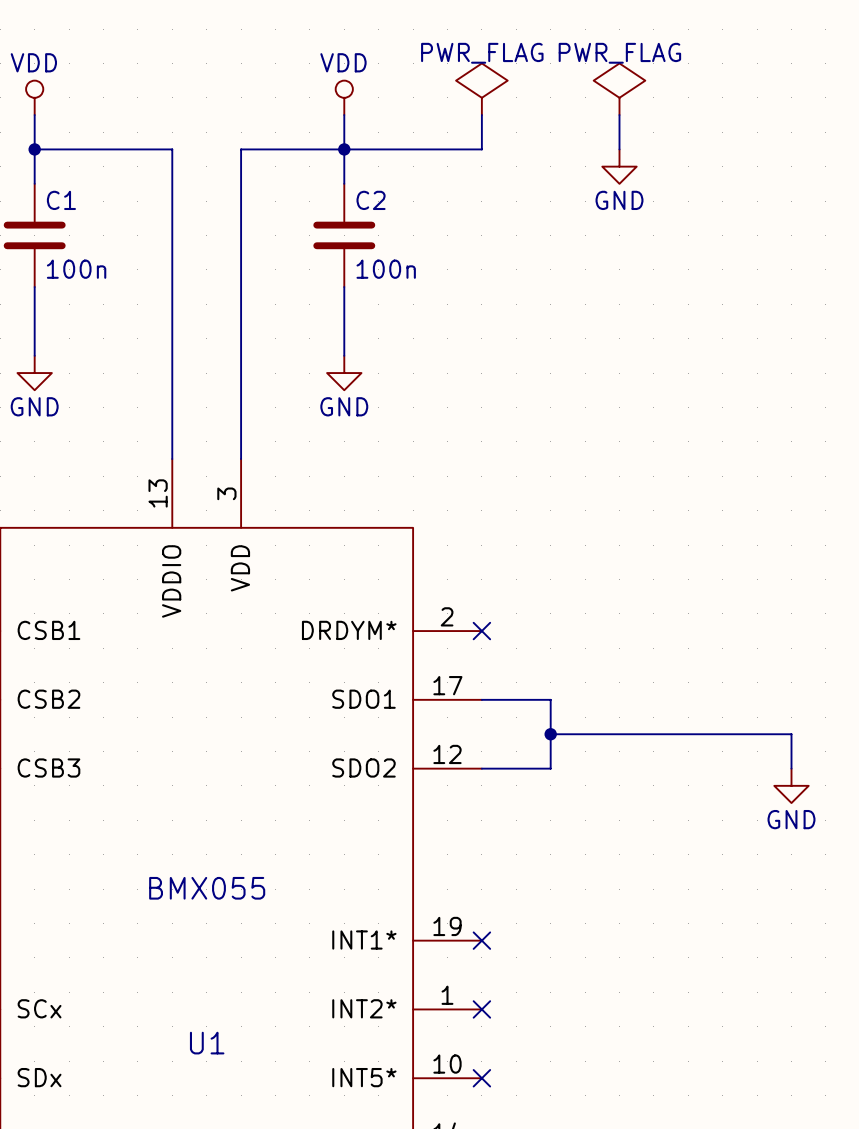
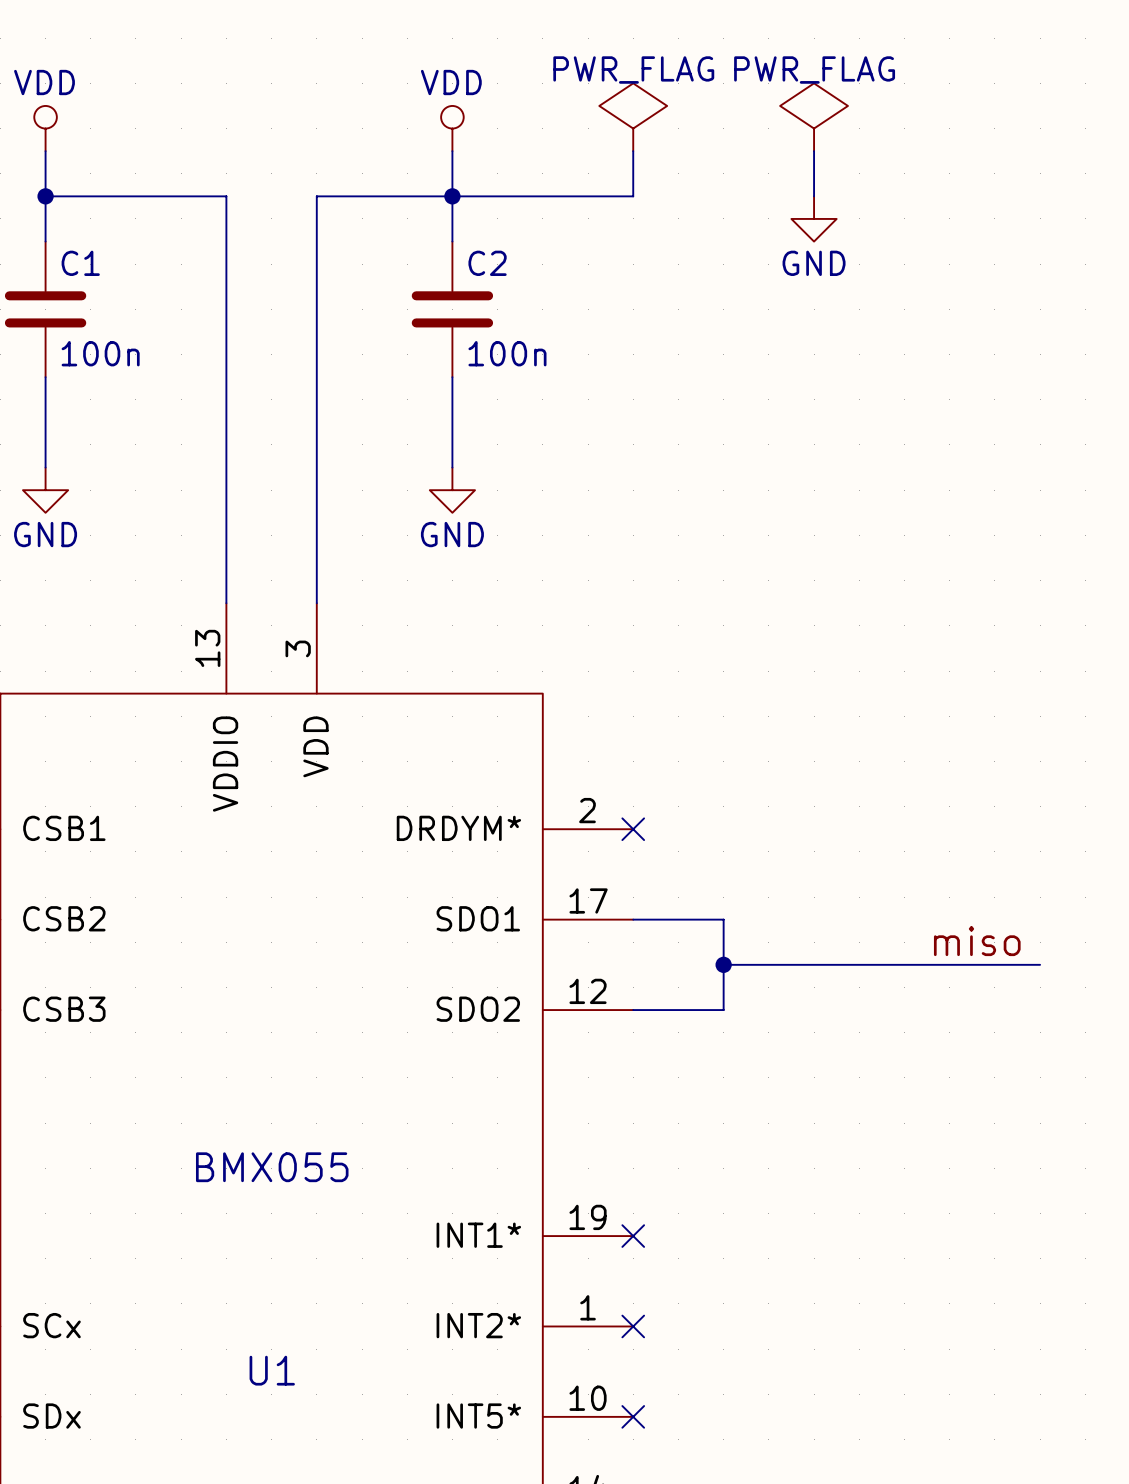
label: none -> miso (977, 941)
wire: (791, 734) (791, 768) -> none
power symbol: GND (791, 785) -> none

